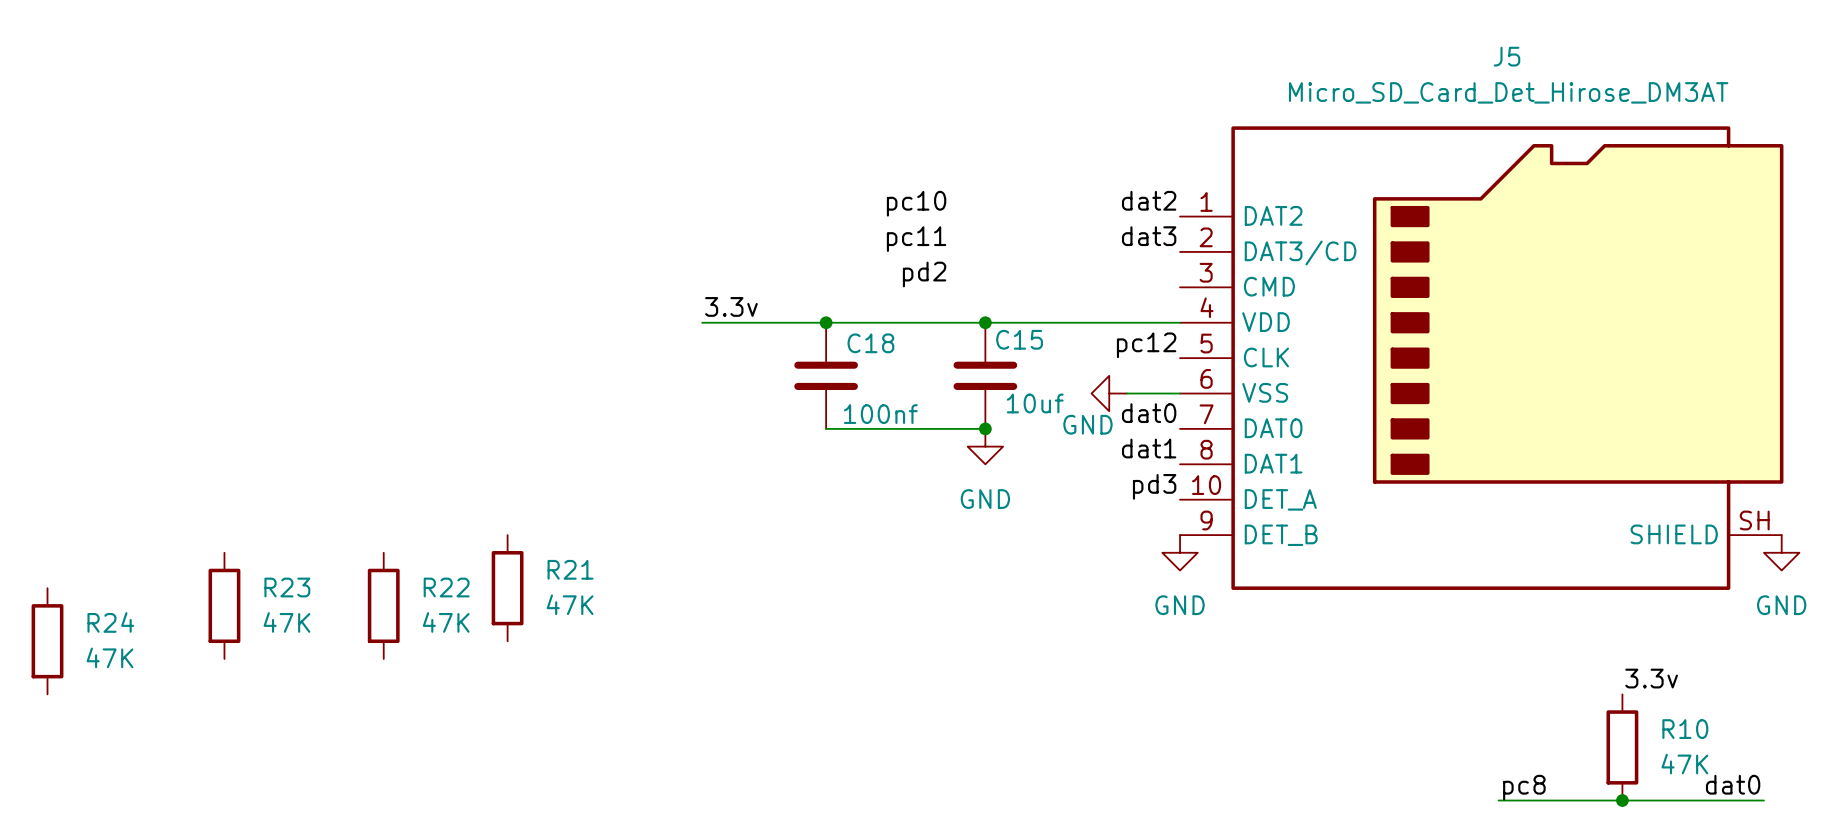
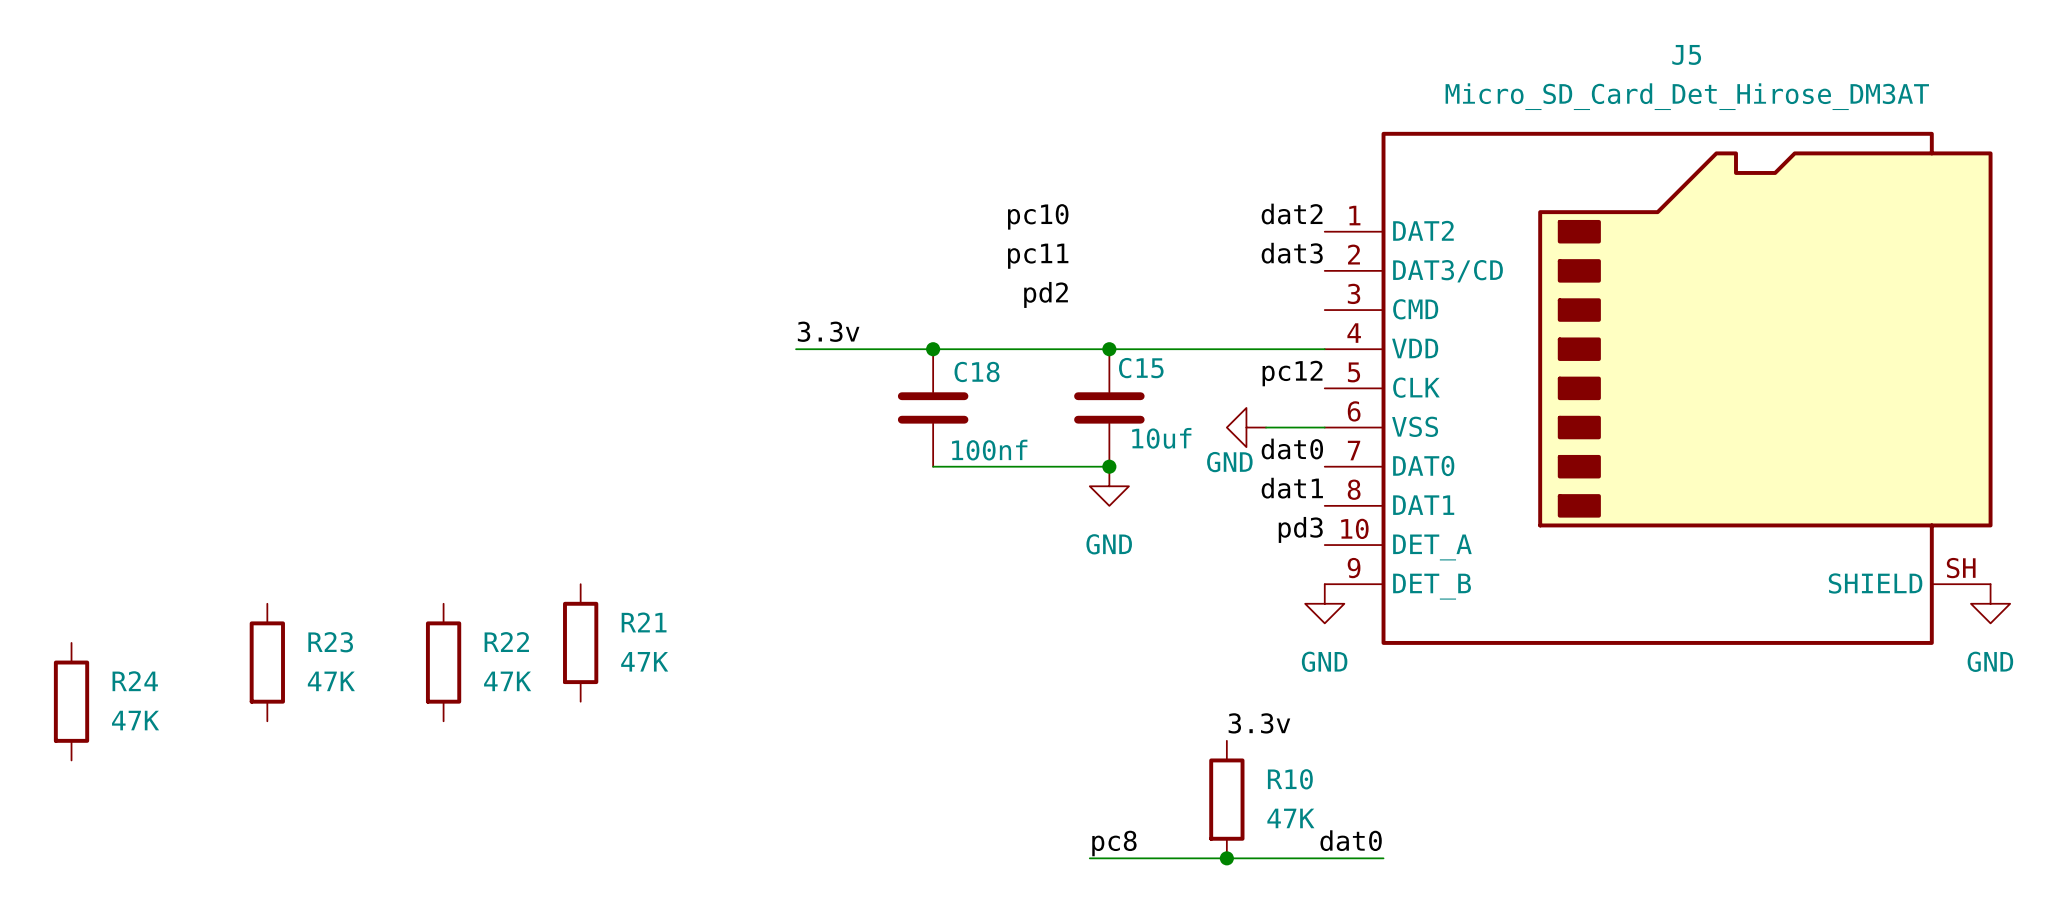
label: none -> 3.3v (1259, 723)
label: 3.3v (1651, 678) -> none
R10 position: (1622, 747) -> (1226, 799)
label: none -> dat0 (1351, 840)
label: none -> pc8 (1114, 843)
wire: none -> (1089, 858) (1383, 858)
junction: none -> (1226, 858)
label: dat0 (1733, 784) -> none
label: pc8 (1524, 787) -> none
wire: (1498, 800) (1763, 800) -> none
junction: (1622, 800) -> none

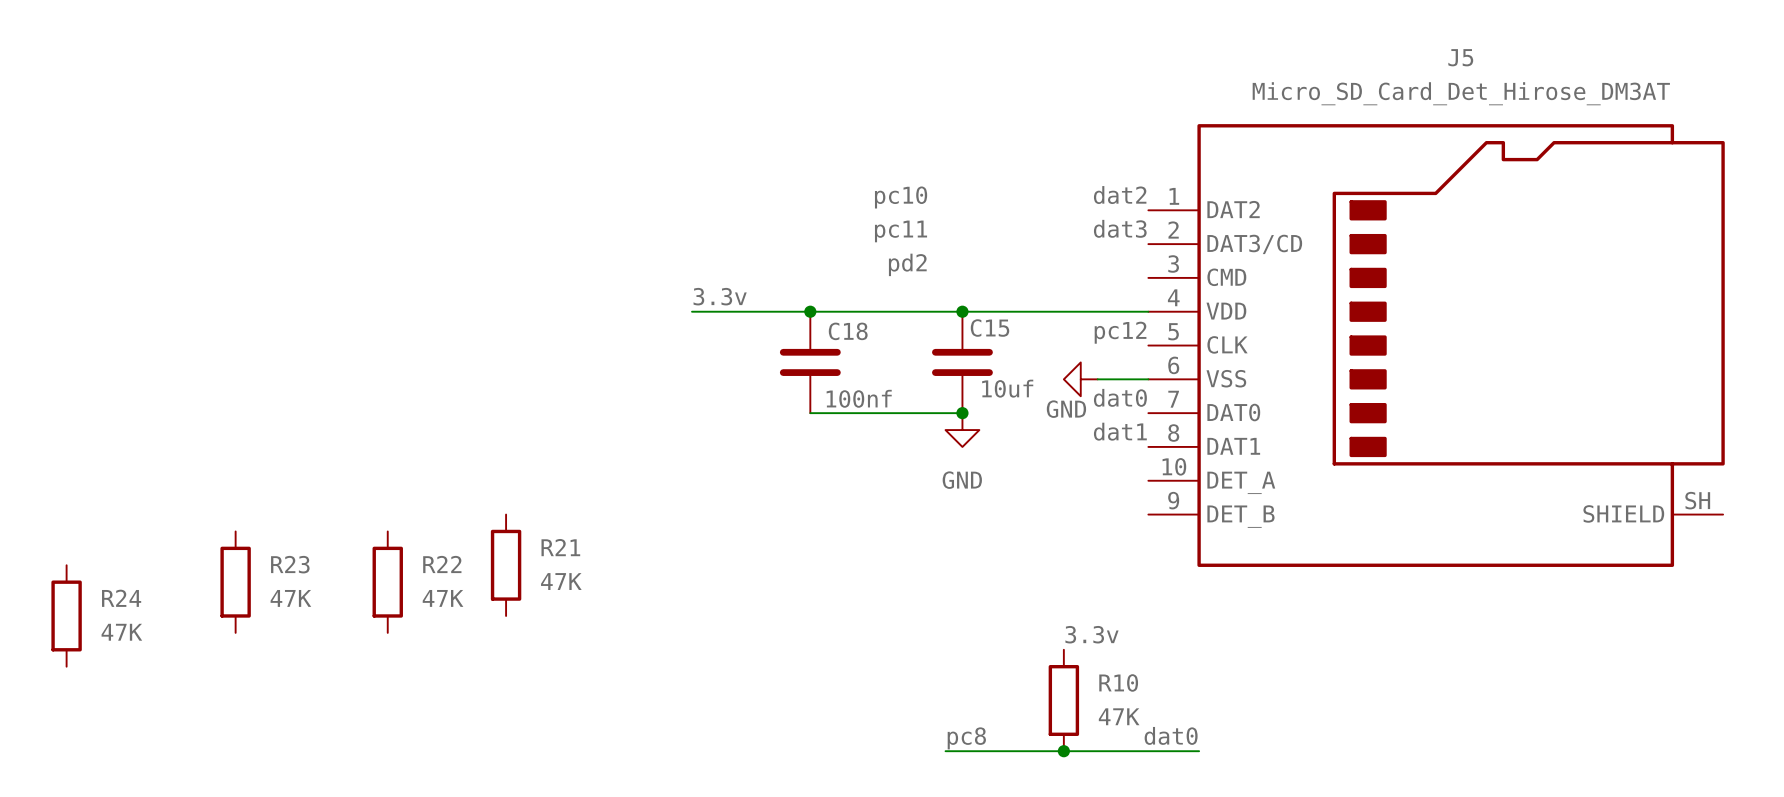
label: pd3 (1300, 529) -> none
power symbol: GND (1324, 603) -> none
power symbol: GND (1990, 603) -> none

